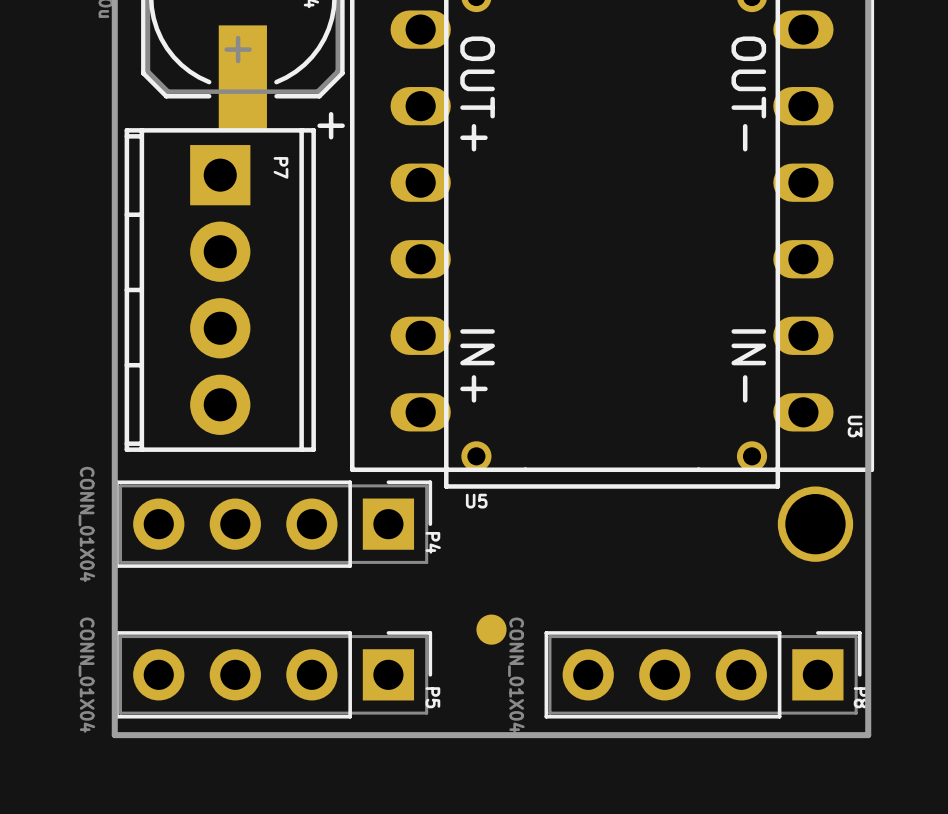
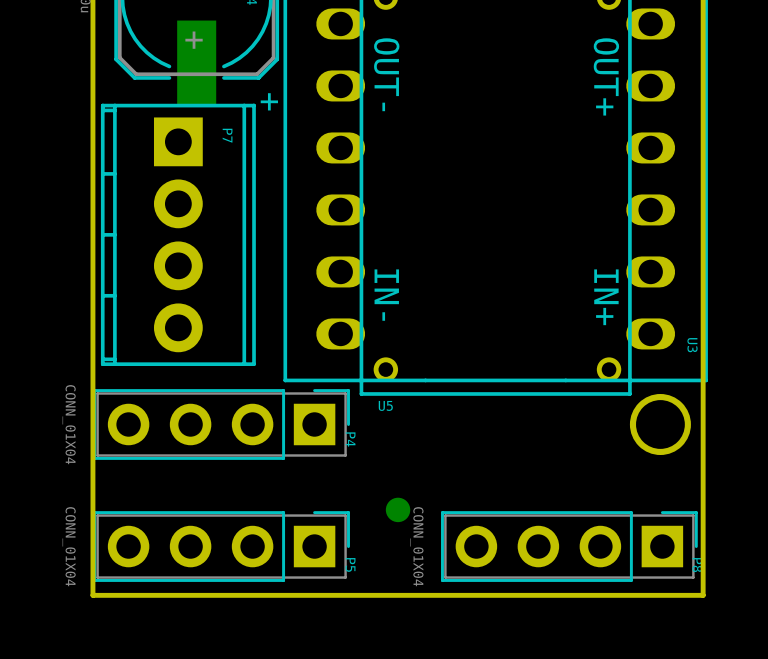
U5 text: OUT+ (477, 93) -> OUT- (386, 74)
U5 text: OUT- (748, 93) -> OUT+ (606, 76)
U5 text: IN+ (477, 365) -> IN- (386, 295)
U5 text: IN- (748, 365) -> IN+ (606, 297)

